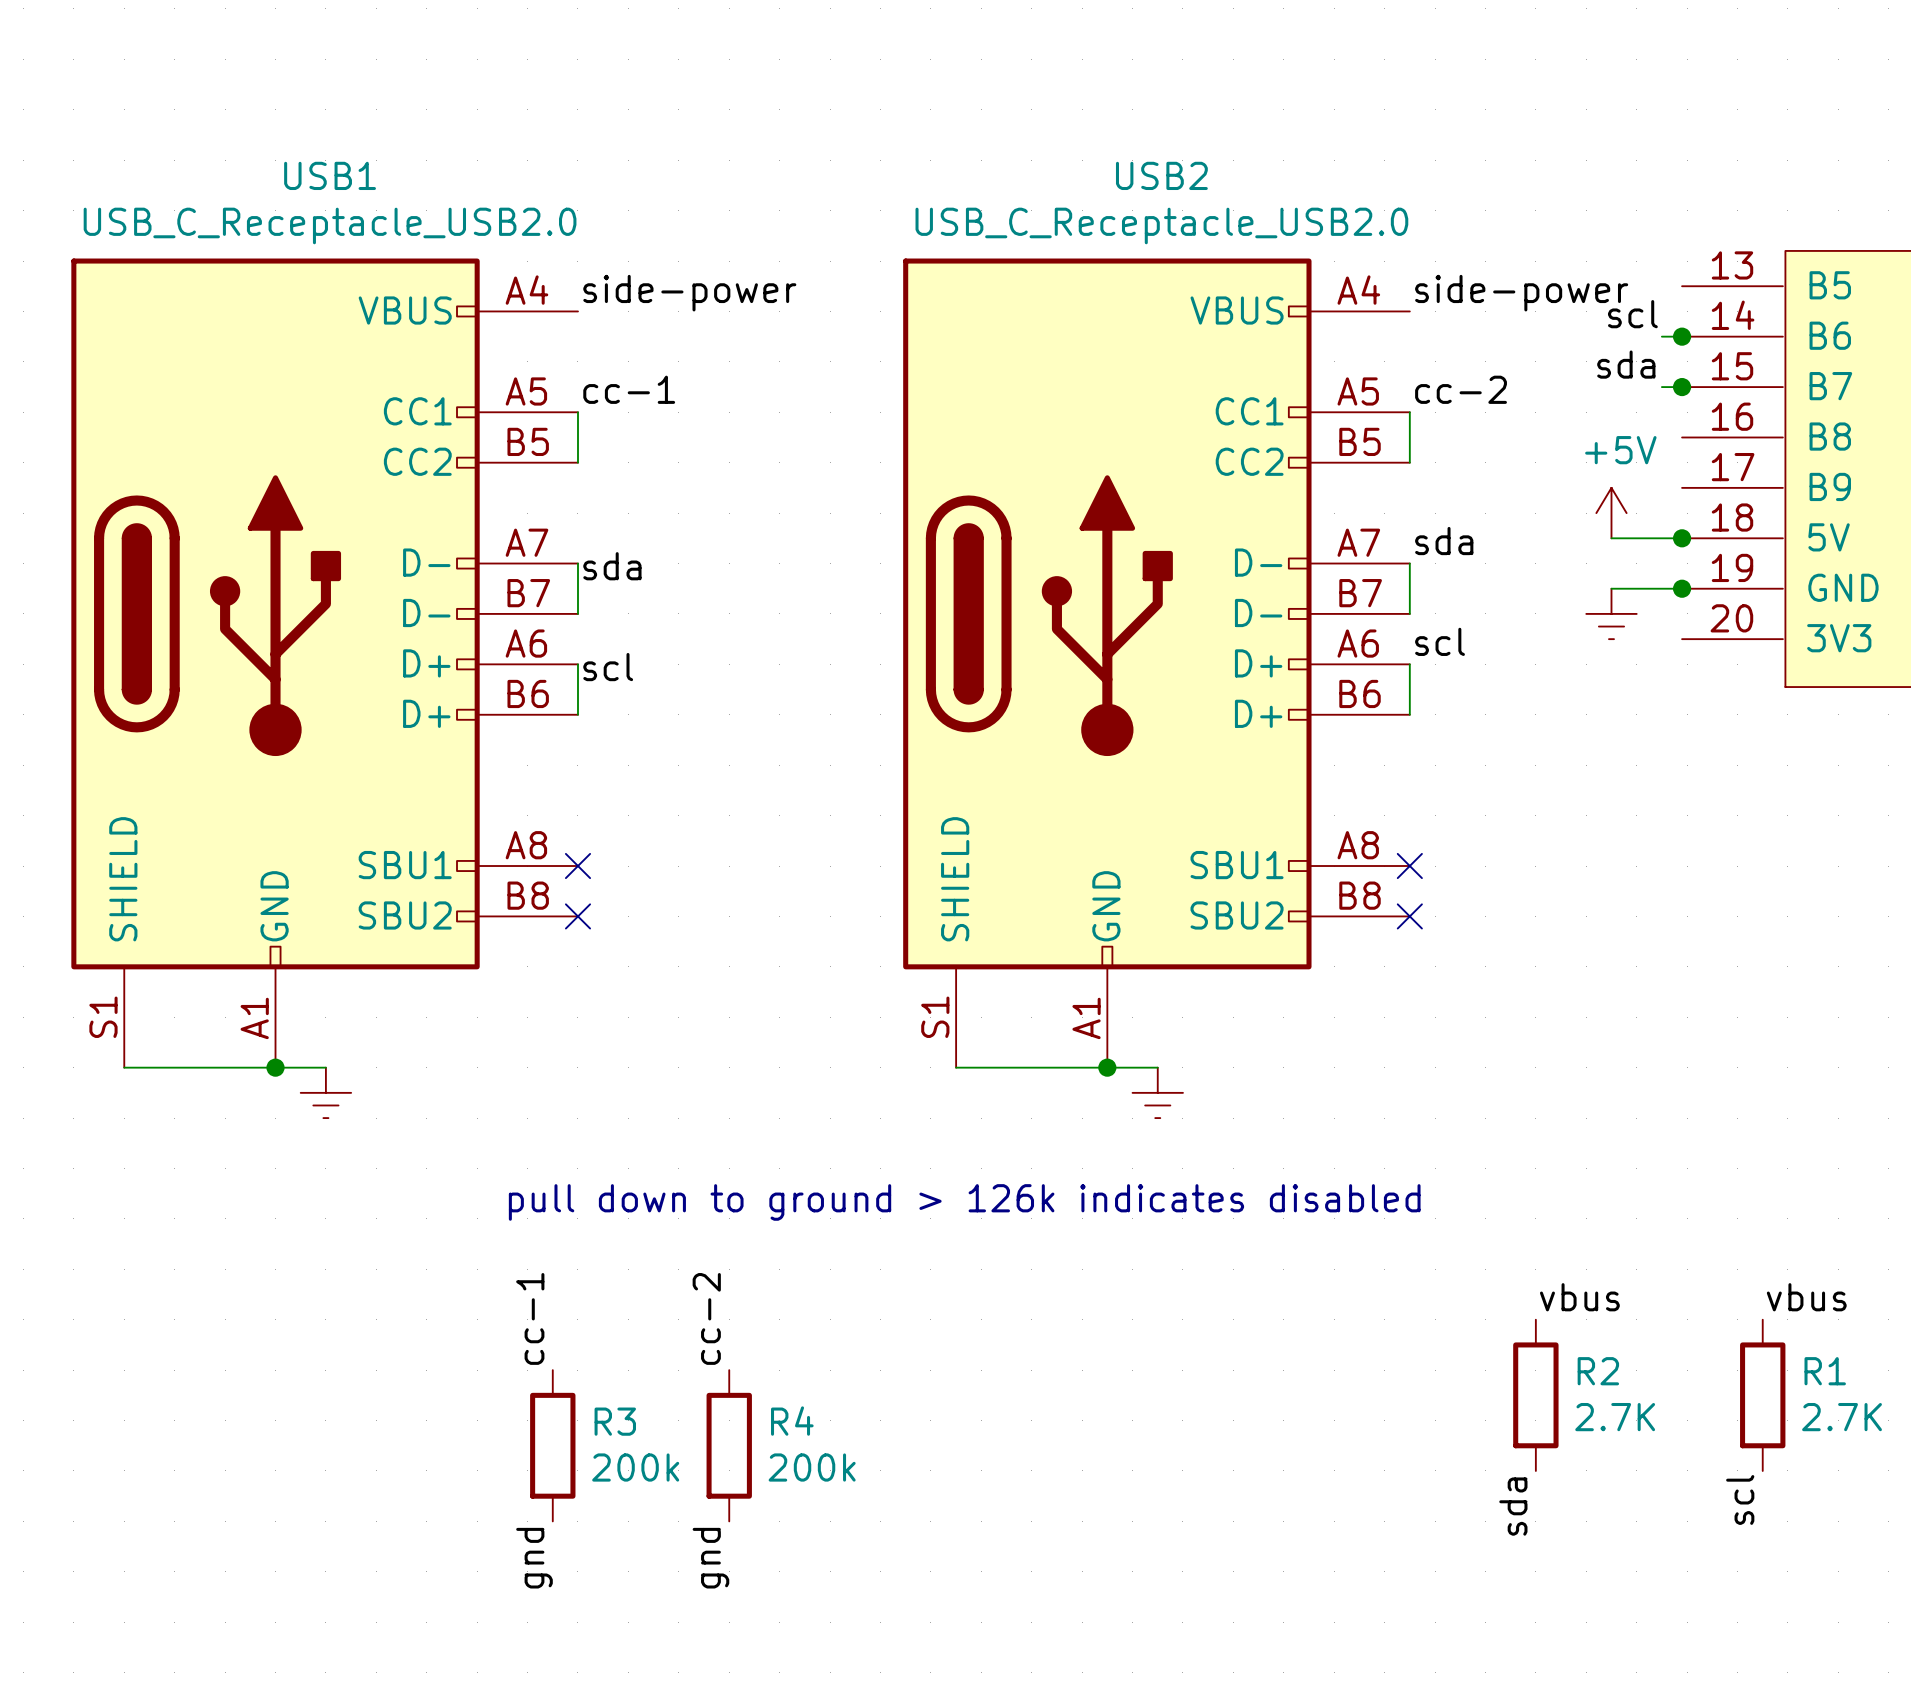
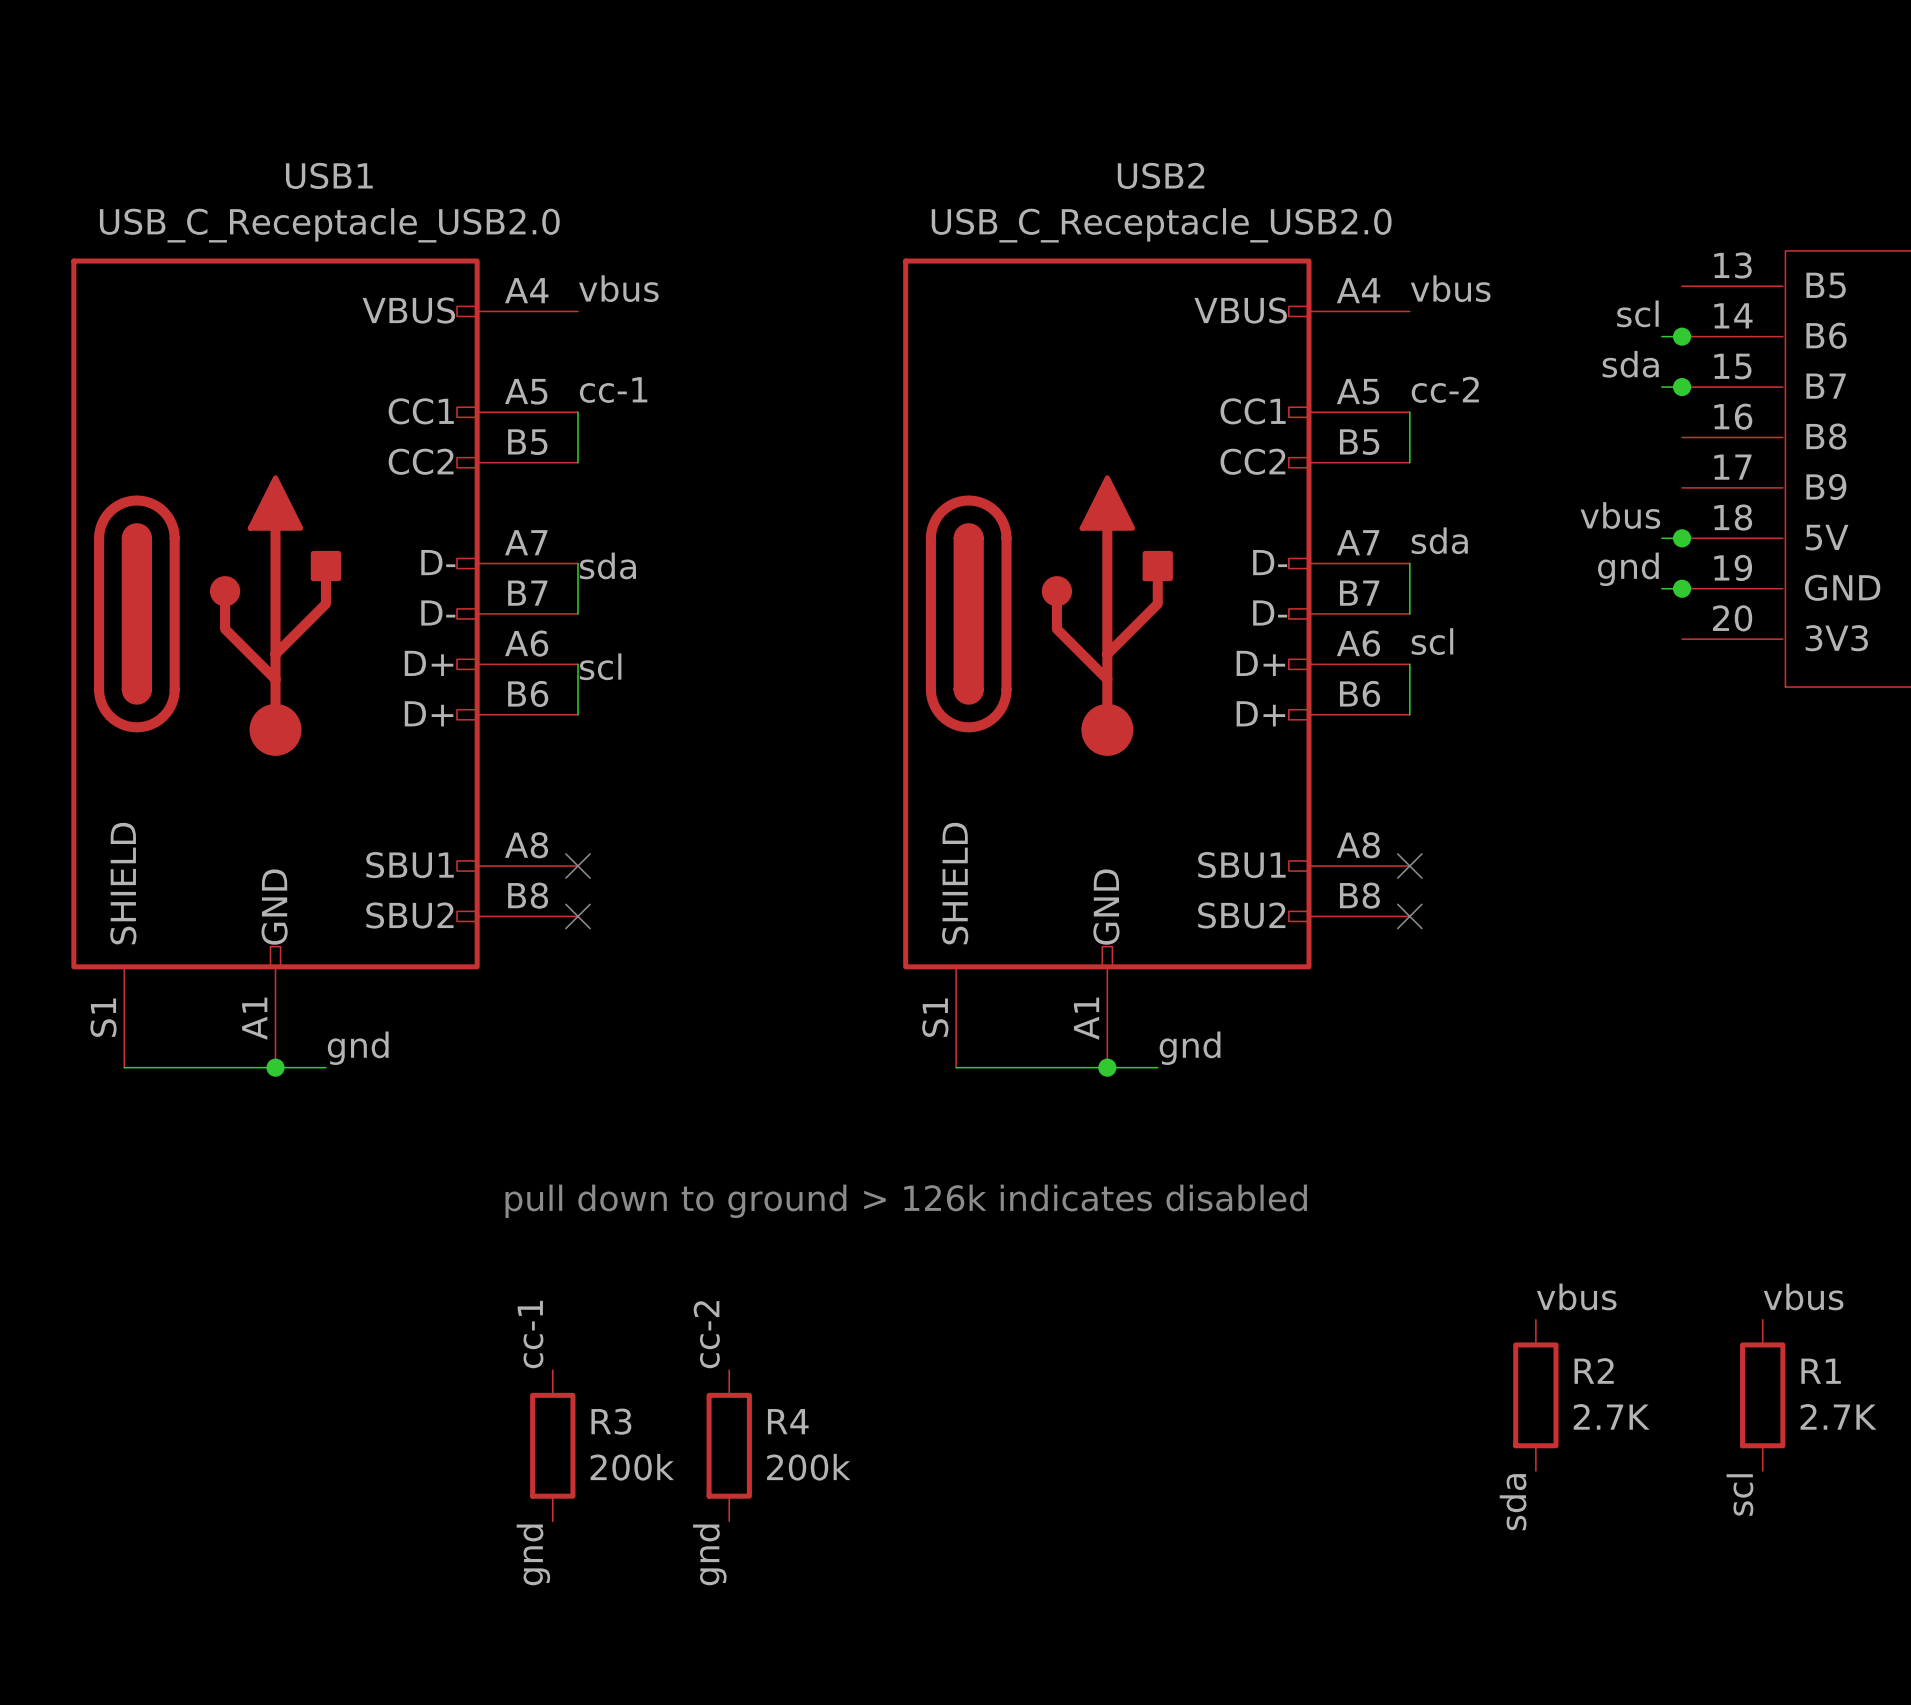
label: side-power (689, 293) -> vbus (618, 288)
label: side-power (1521, 293) -> vbus (1450, 288)
power symbol: +5V (1611, 513) -> none
label: none -> vbus (1620, 515)
wire: (1611, 538) (1661, 538) -> none
label: none -> gnd (1628, 569)
wire: (1611, 588) (1661, 588) -> none
power symbol: (1611, 613) -> none
label: none -> gnd (358, 1048)
label: none -> gnd (1190, 1048)
power symbol: (325, 1092) -> none
power symbol: (1157, 1092) -> none

